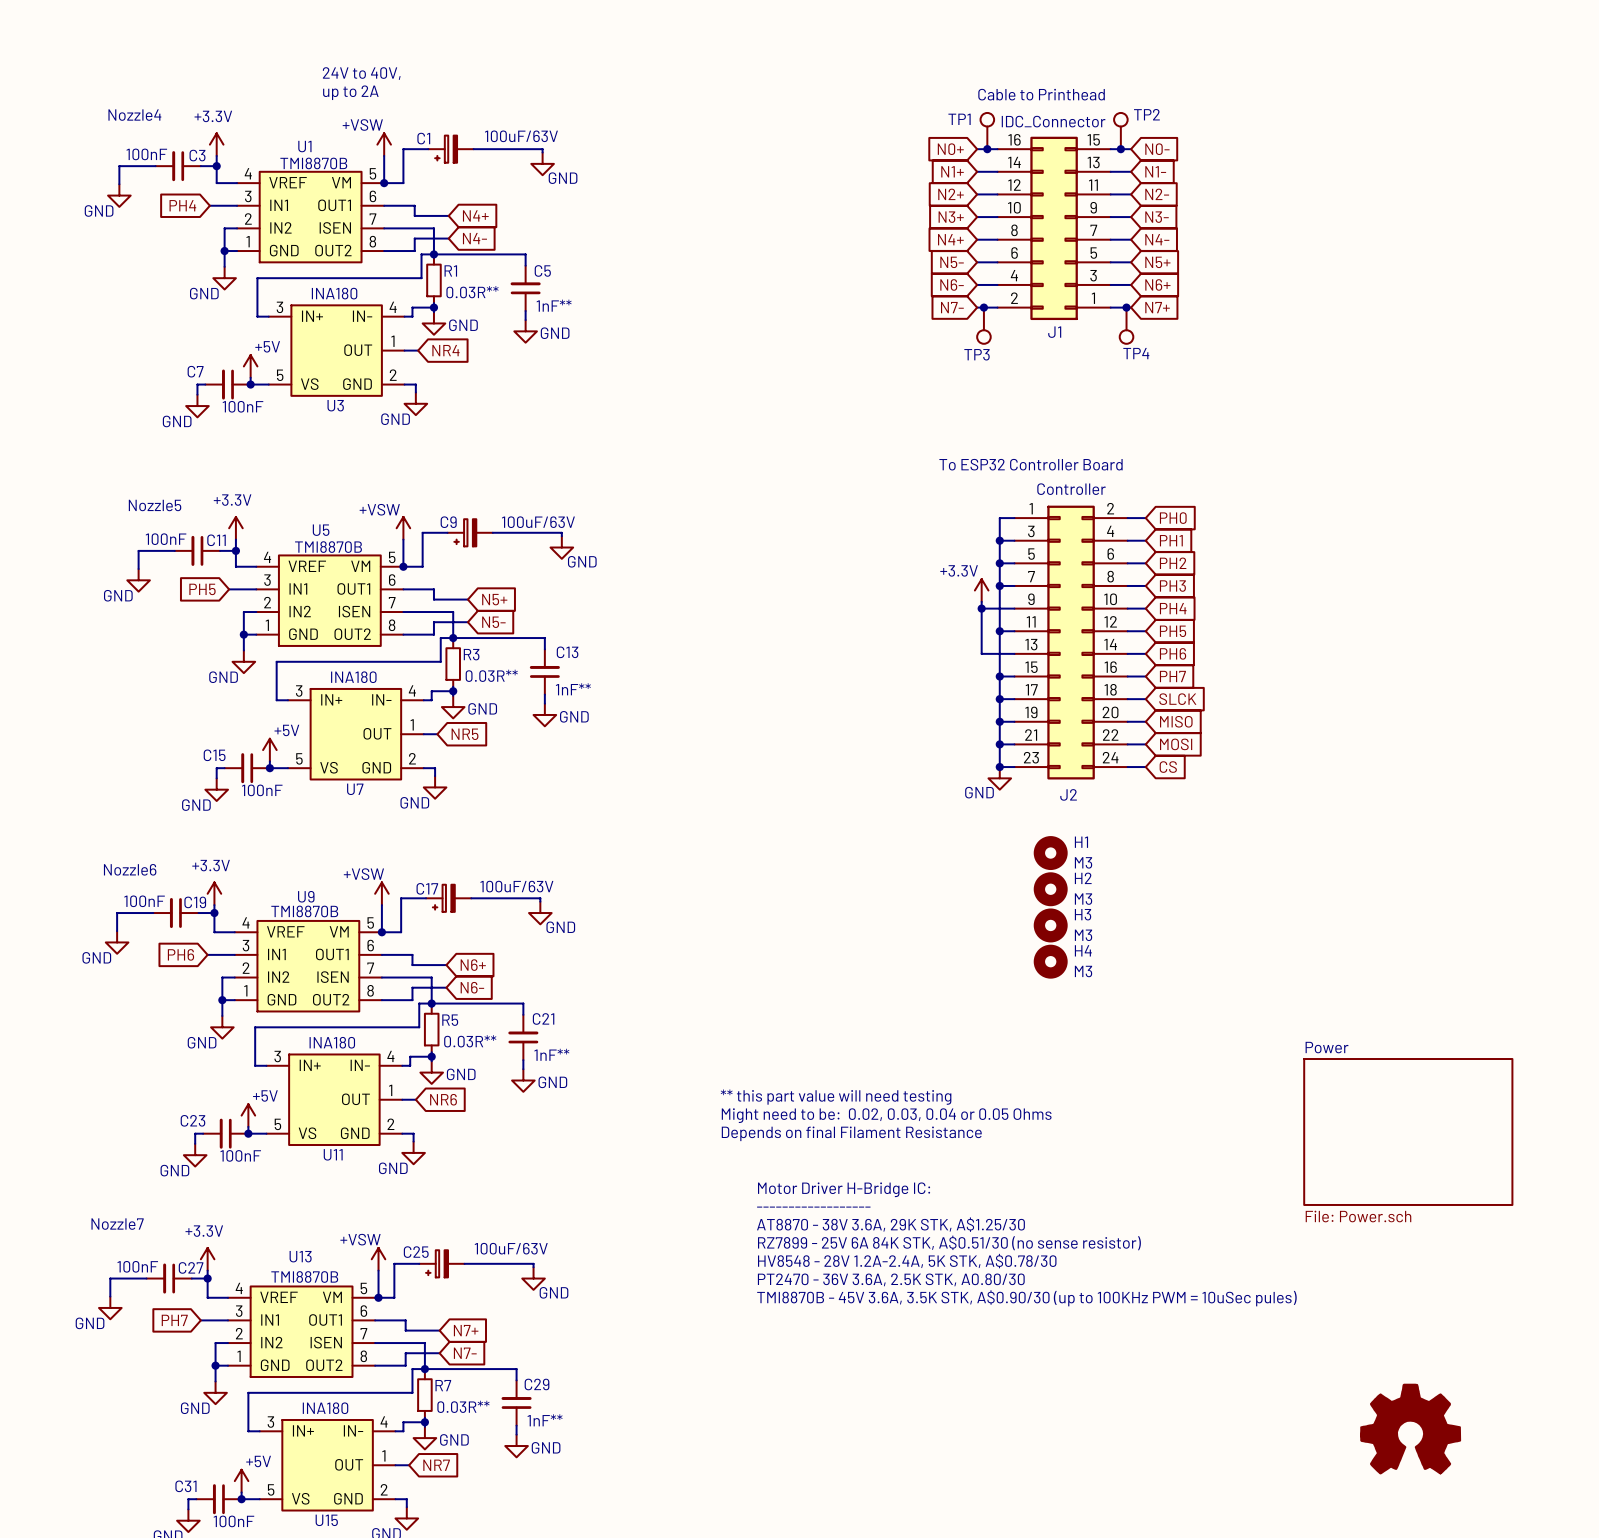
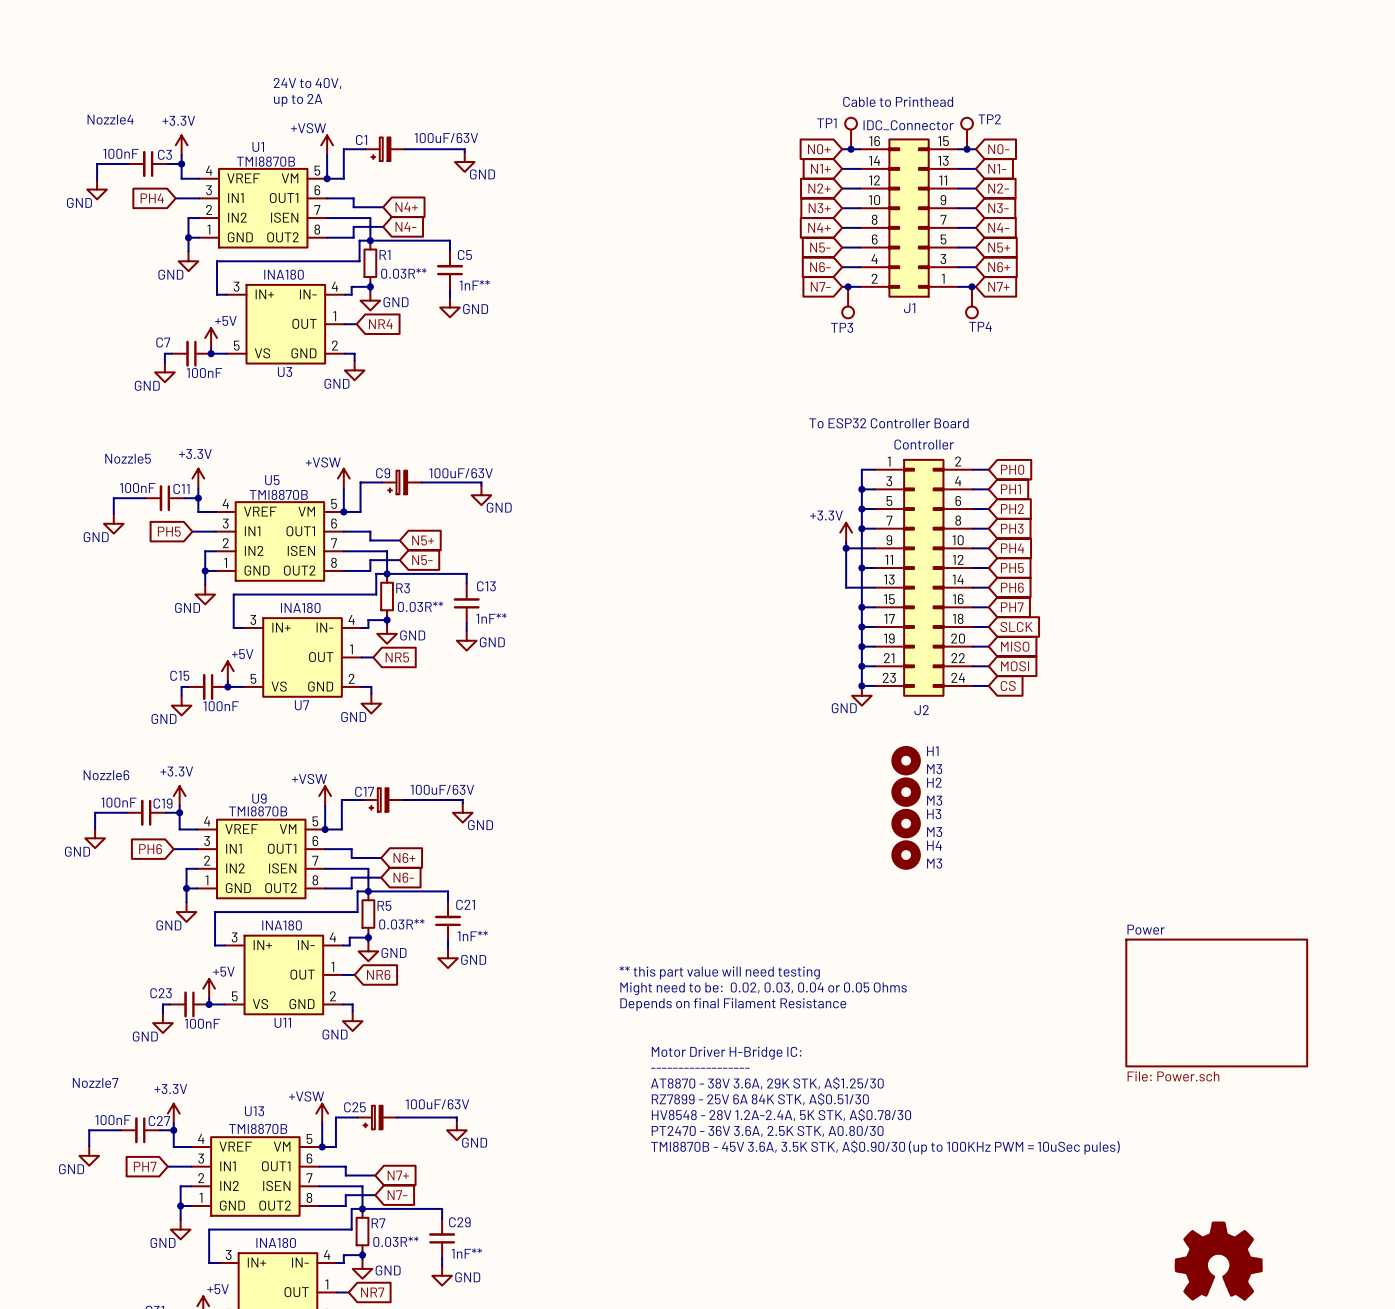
text: RZ7899 - 25V 6A 84K STK, A$0.51/30 (no sense resistor) (949, 1242) -> RZ7899 - 25V 6A 84K STK, A$0.51/30 (760, 1099)

